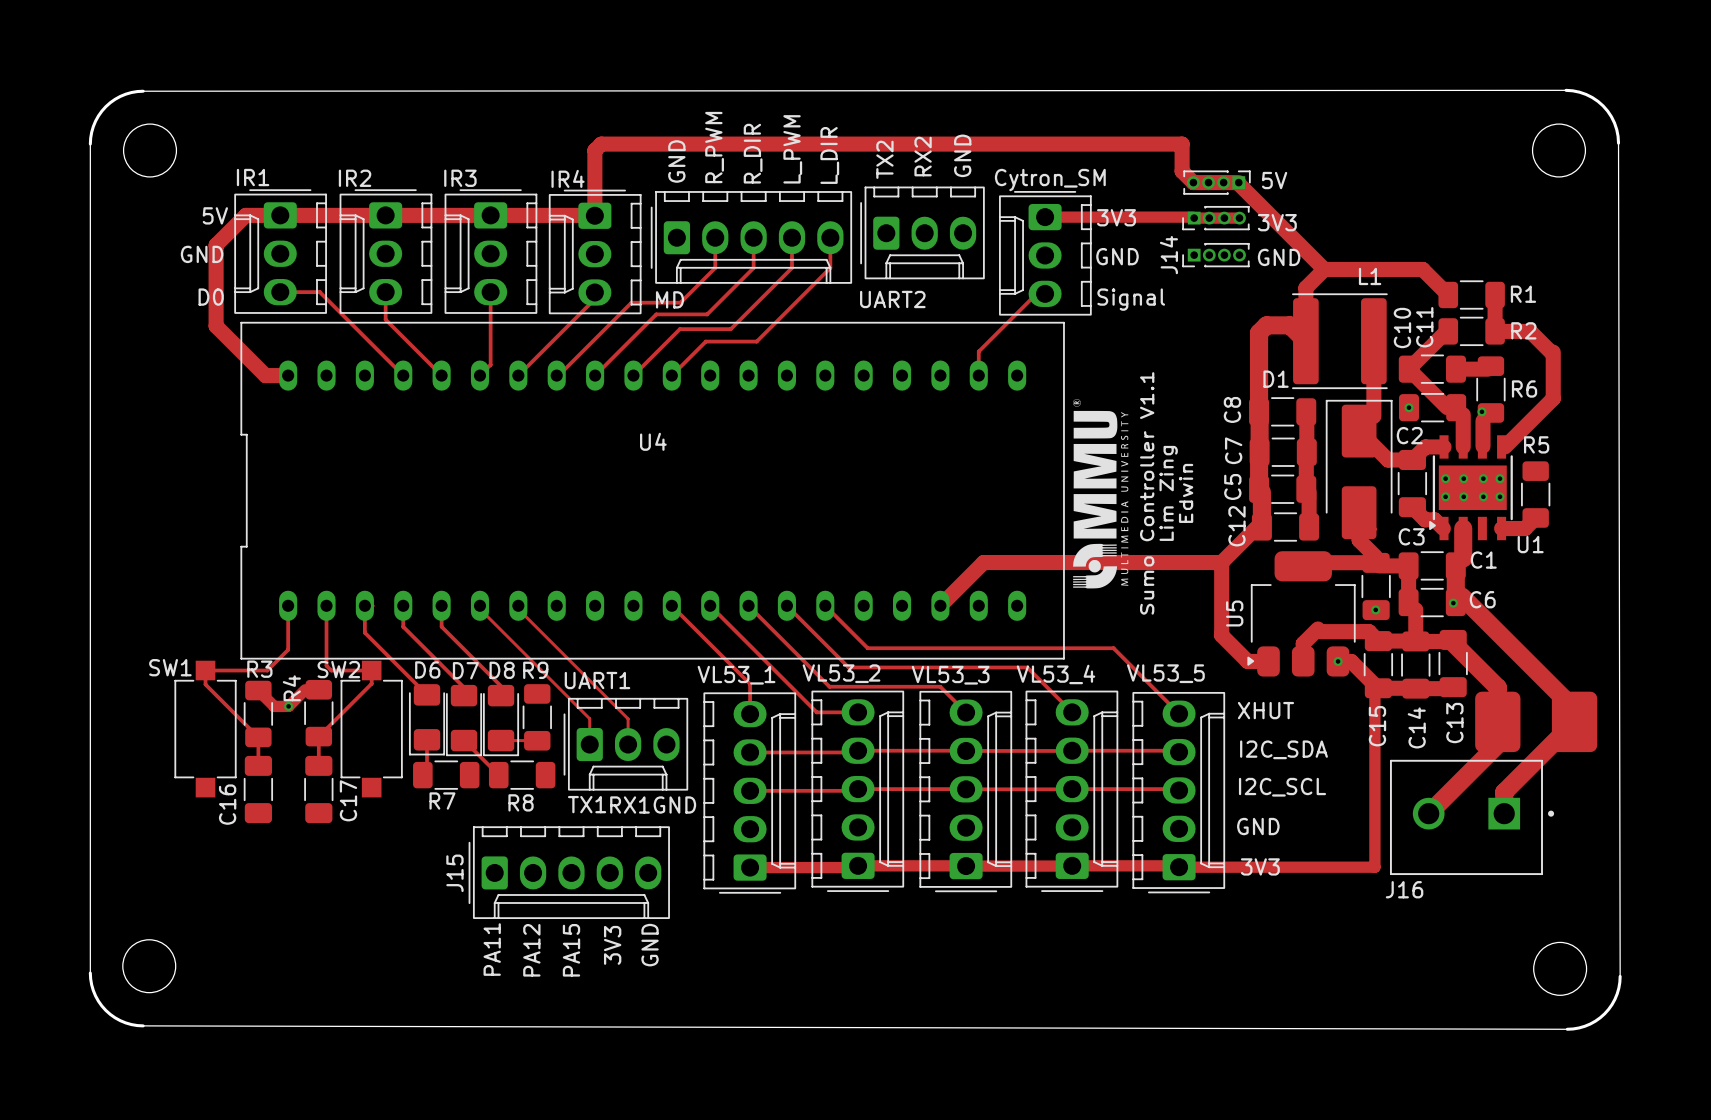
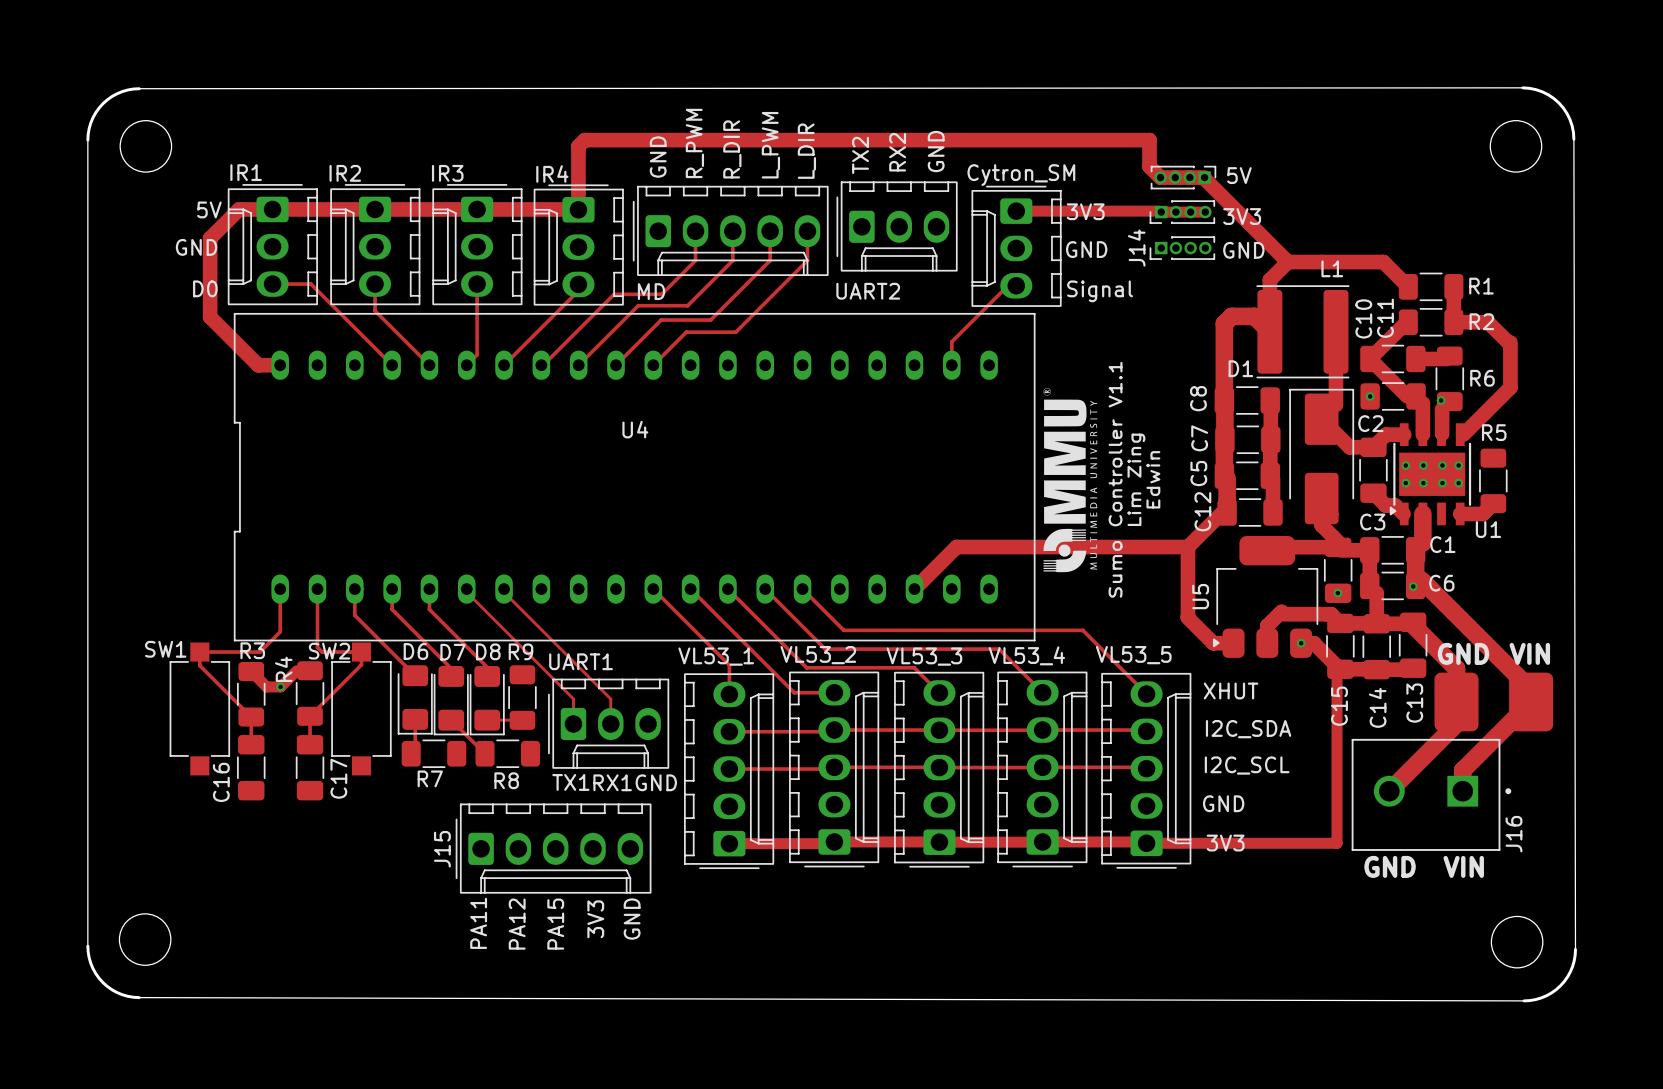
text: none -> GND (1463, 653)
text: none -> VIN (1529, 653)
J16 name rotation: 0° (1404, 889) -> 90° counterclockwise (1513, 834)
J16 name position: J16 (1404, 889) -> J16 (1513, 834)
text: none -> GND (1390, 866)
text: none -> VIN (1463, 866)

